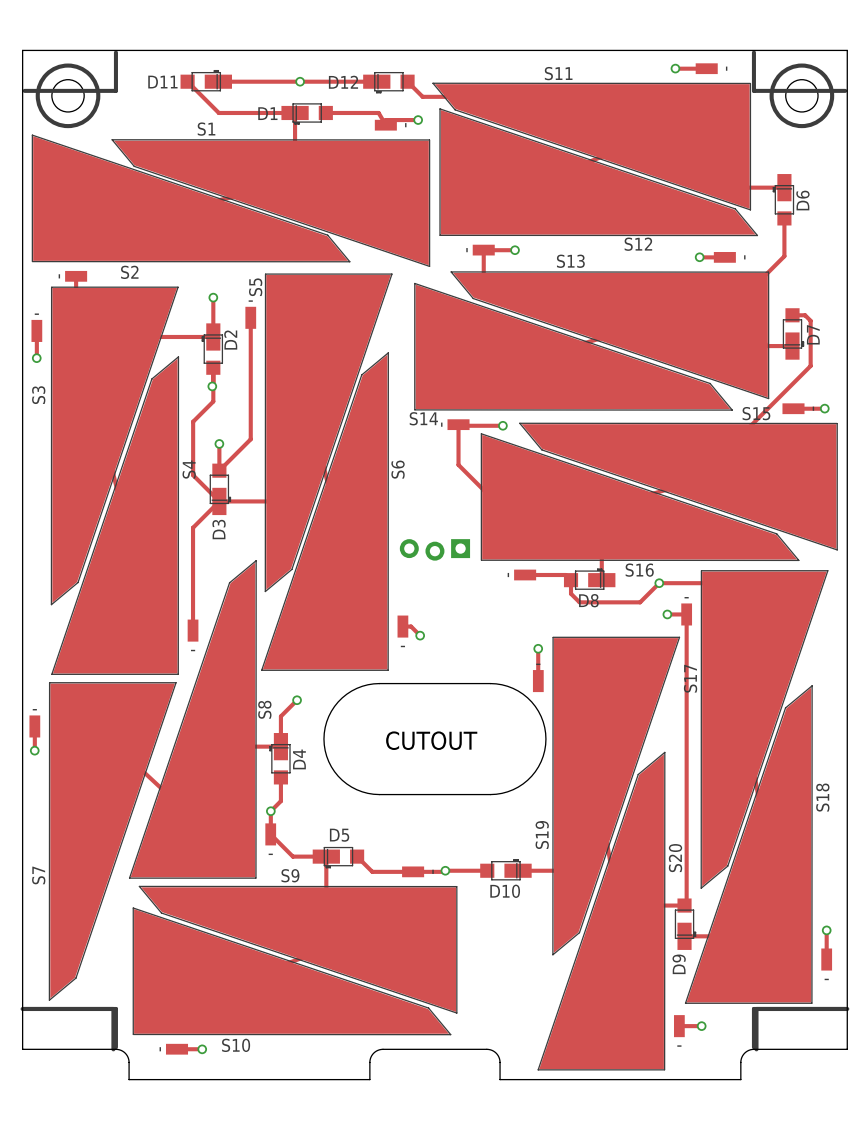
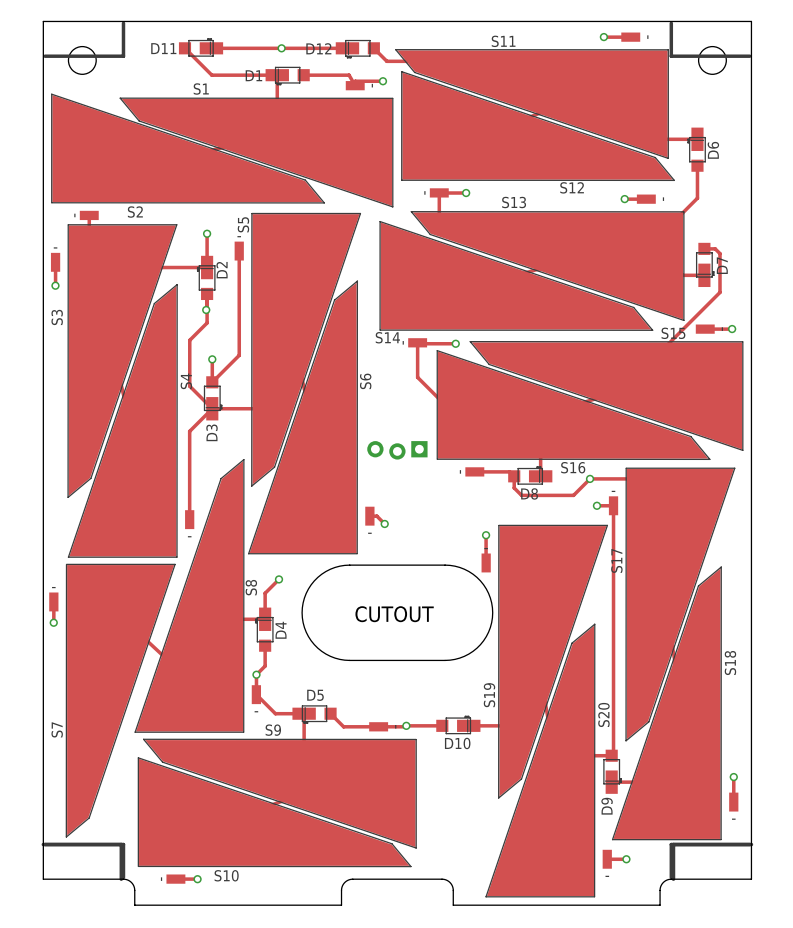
drawing: [35, 63, 101, 129] -> none
drawing: [769, 63, 835, 129] -> none

